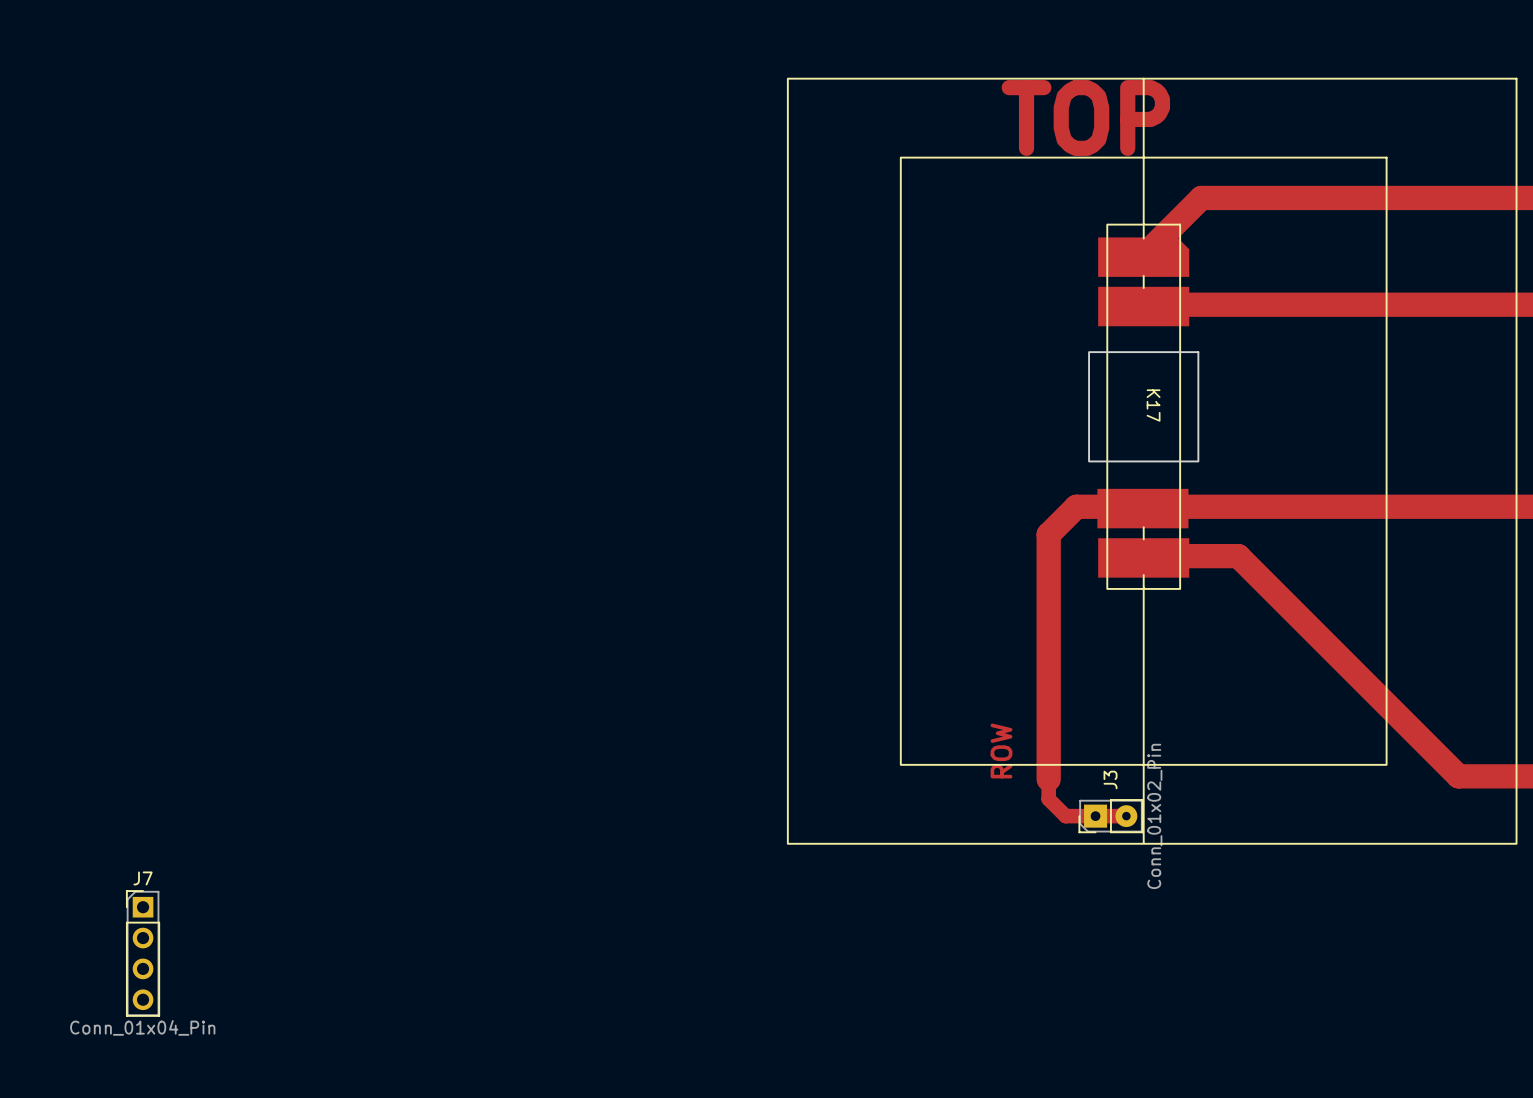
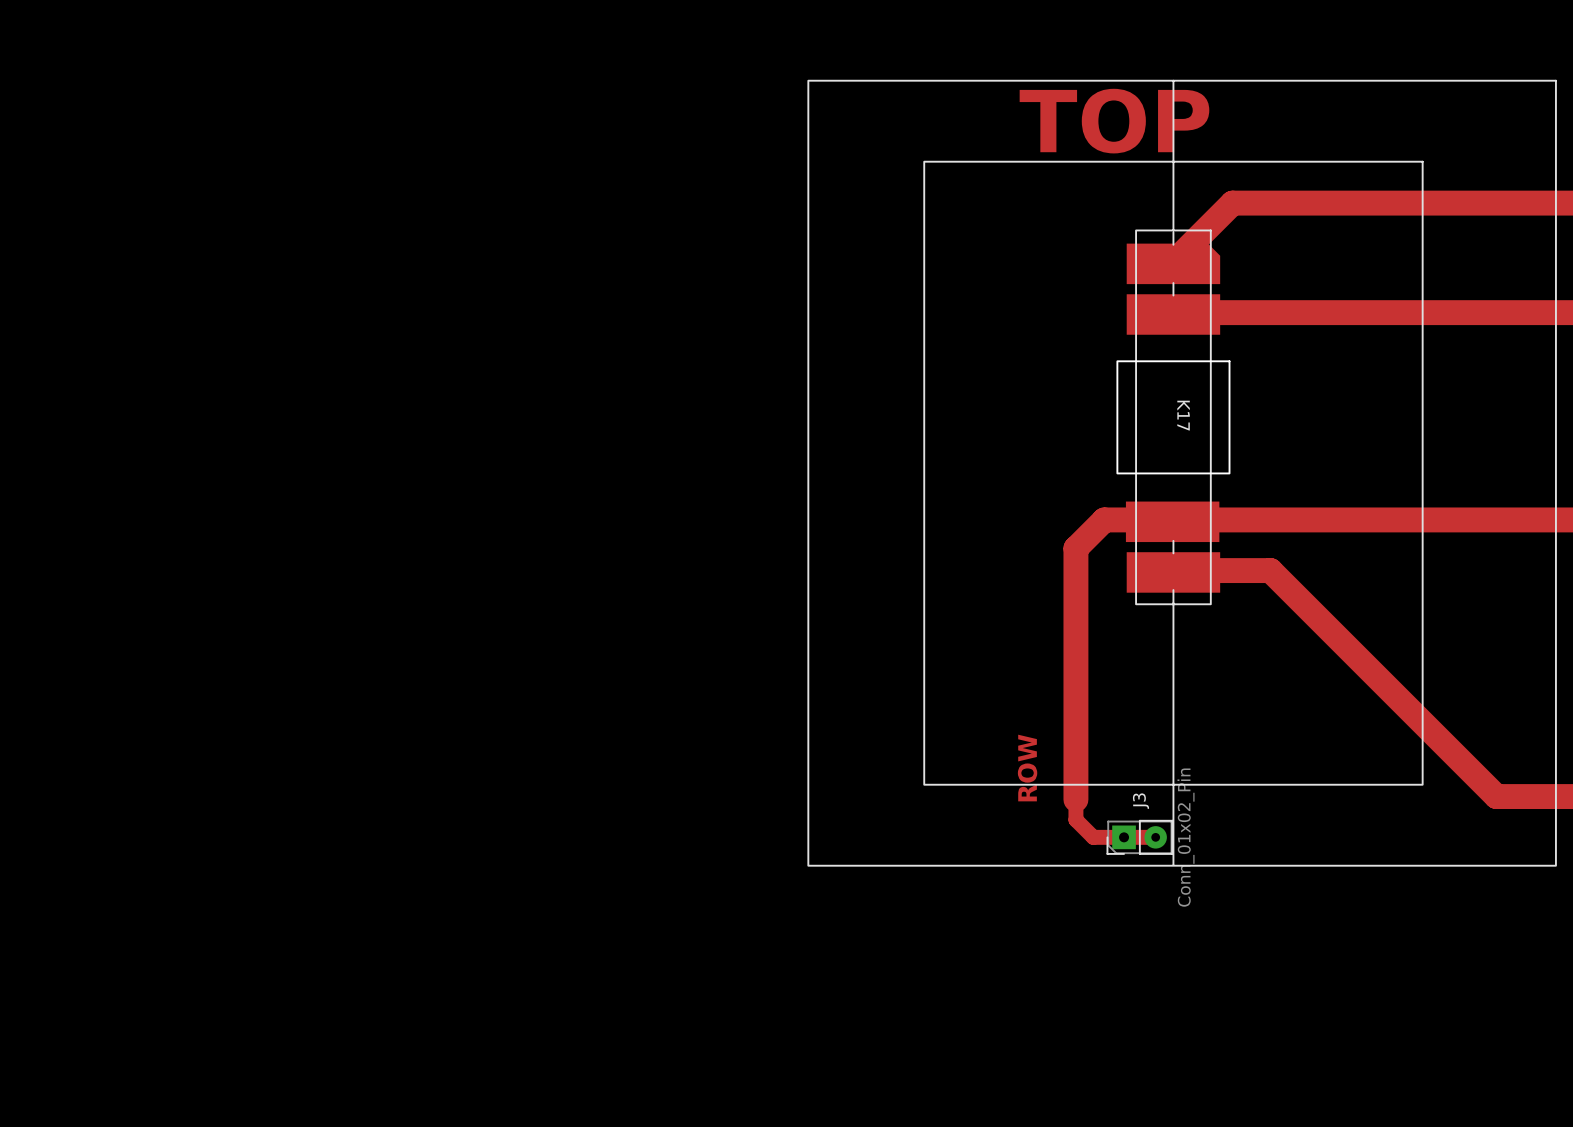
J7: Conn_01x04_Pin (143, 953) -> none

